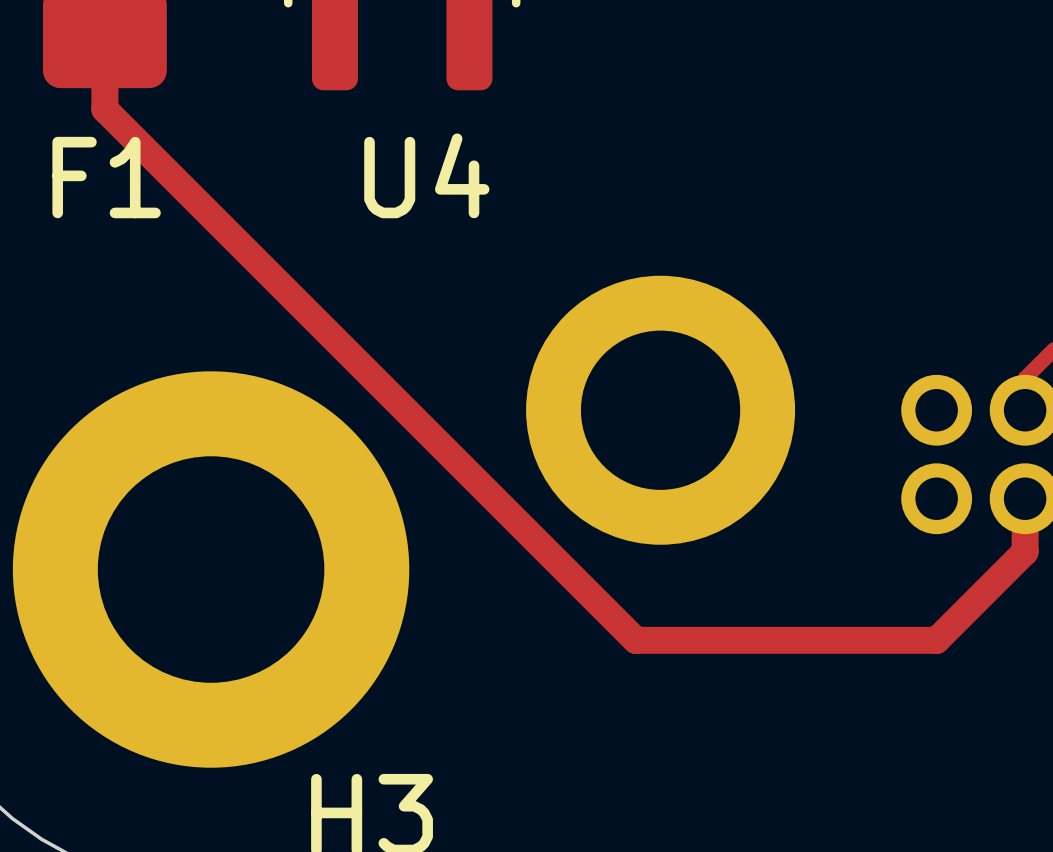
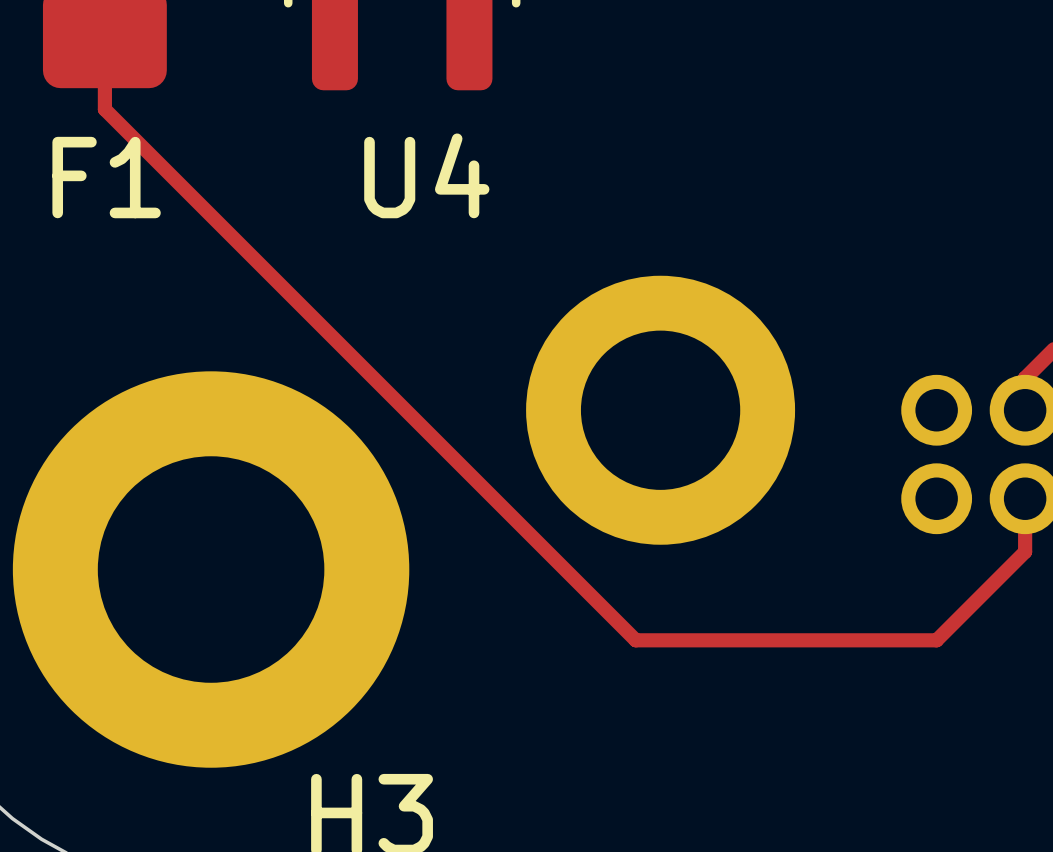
track width: thick (104, 37) (104, 109) (635, 640) (936, 640) (1025, 551) (1025, 498) -> thin (104, 37) (104, 109) (635, 640) (936, 640) (1025, 551) (1025, 498)

